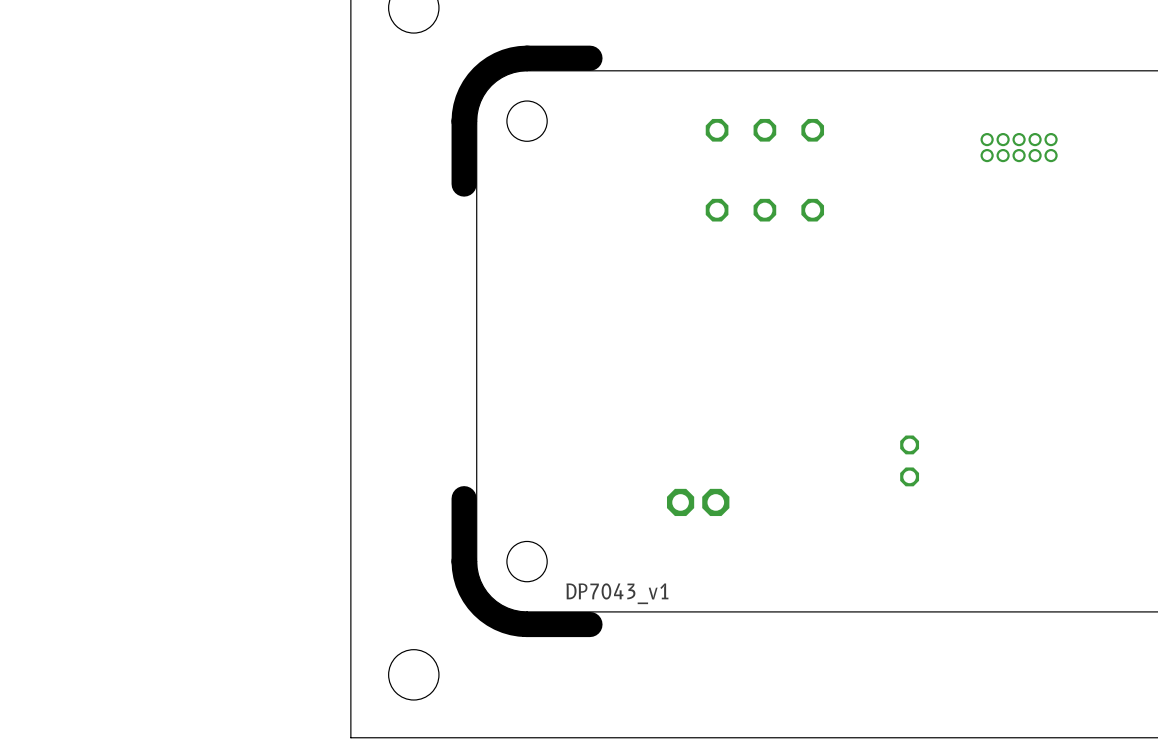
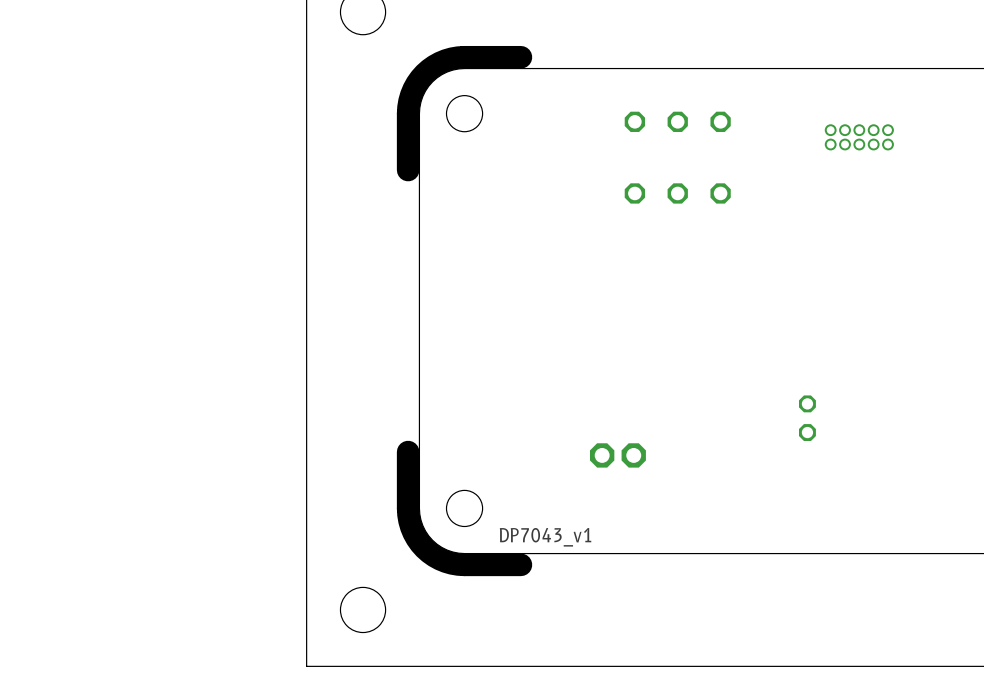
part position: (1019, 147) -> (859, 137)

